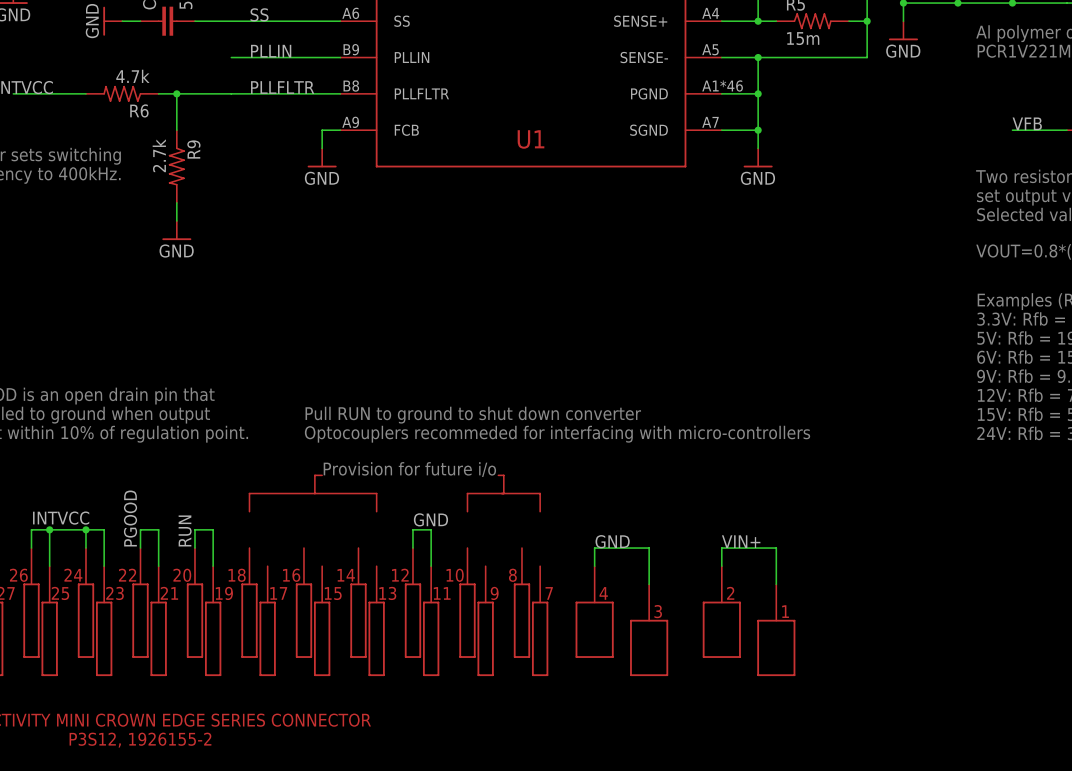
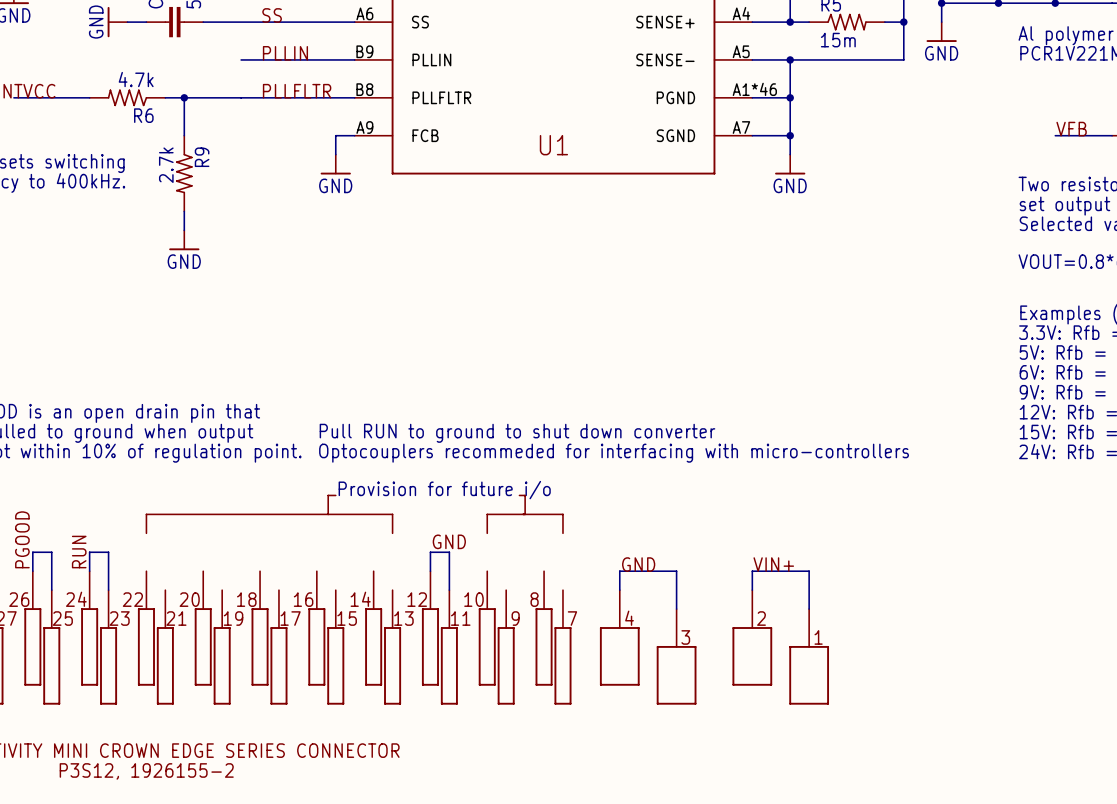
line: (249, 493) (249, 511) -> (260, 514) (146, 514) (146, 533)
label: INTVCC (61, 518) -> none
label position: PGOOD (130, 518) -> PGOOD (22, 539)
wire: (49, 529) (85, 529) -> none
junction: (49, 529) -> none
junction: (85, 529) -> none
label position: RUN (185, 530) -> RUN (79, 552)
wire: (140, 548) (140, 529) (158, 529) (158, 566) -> none
wire: (194, 548) (194, 529) (213, 529) (213, 566) -> none

